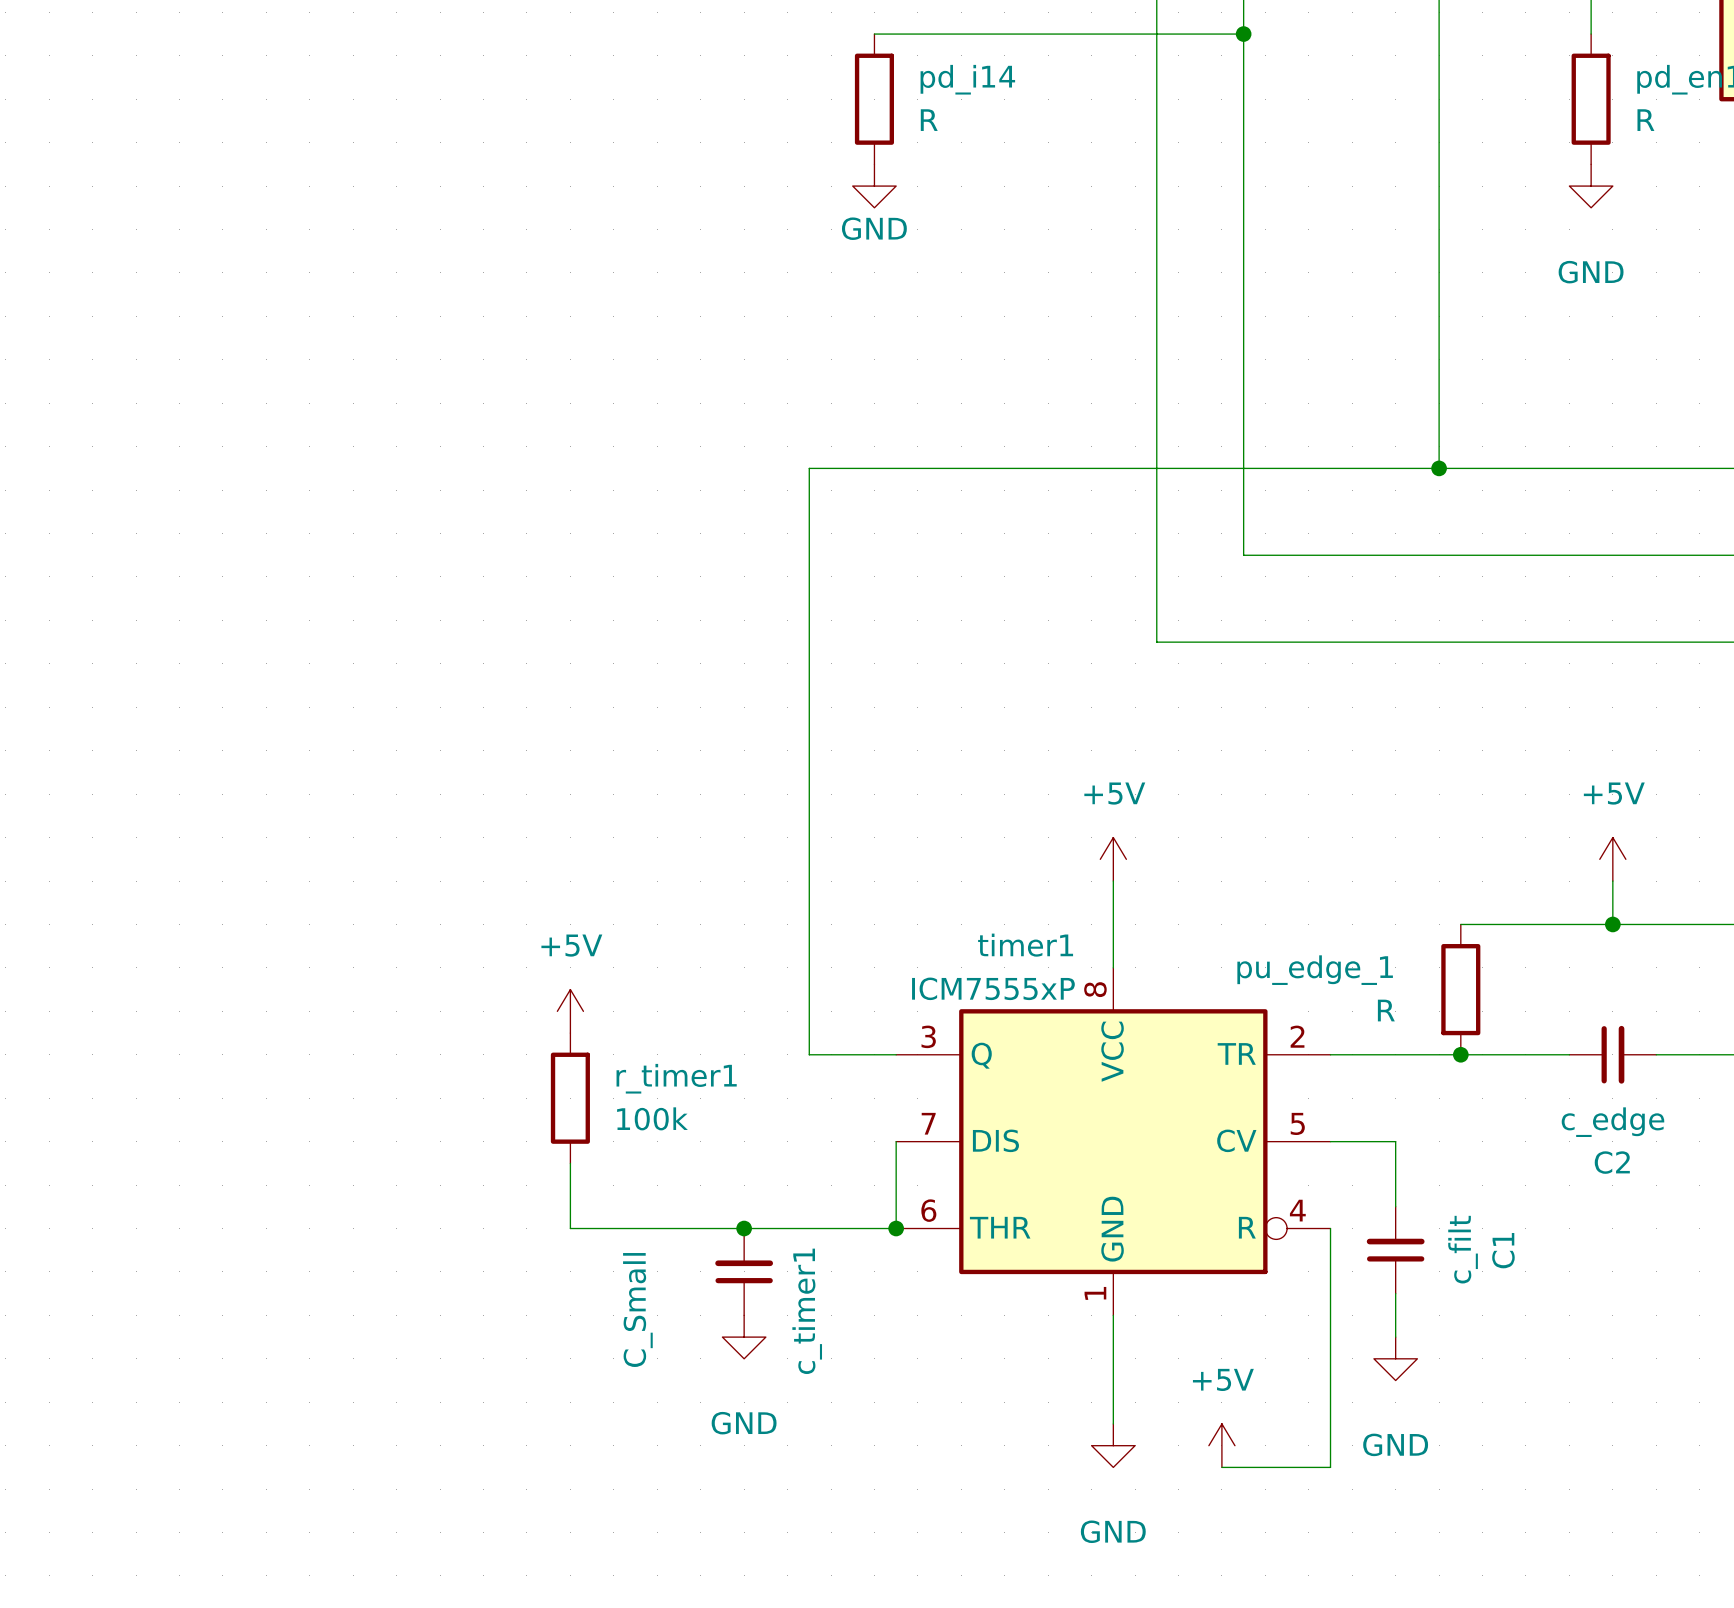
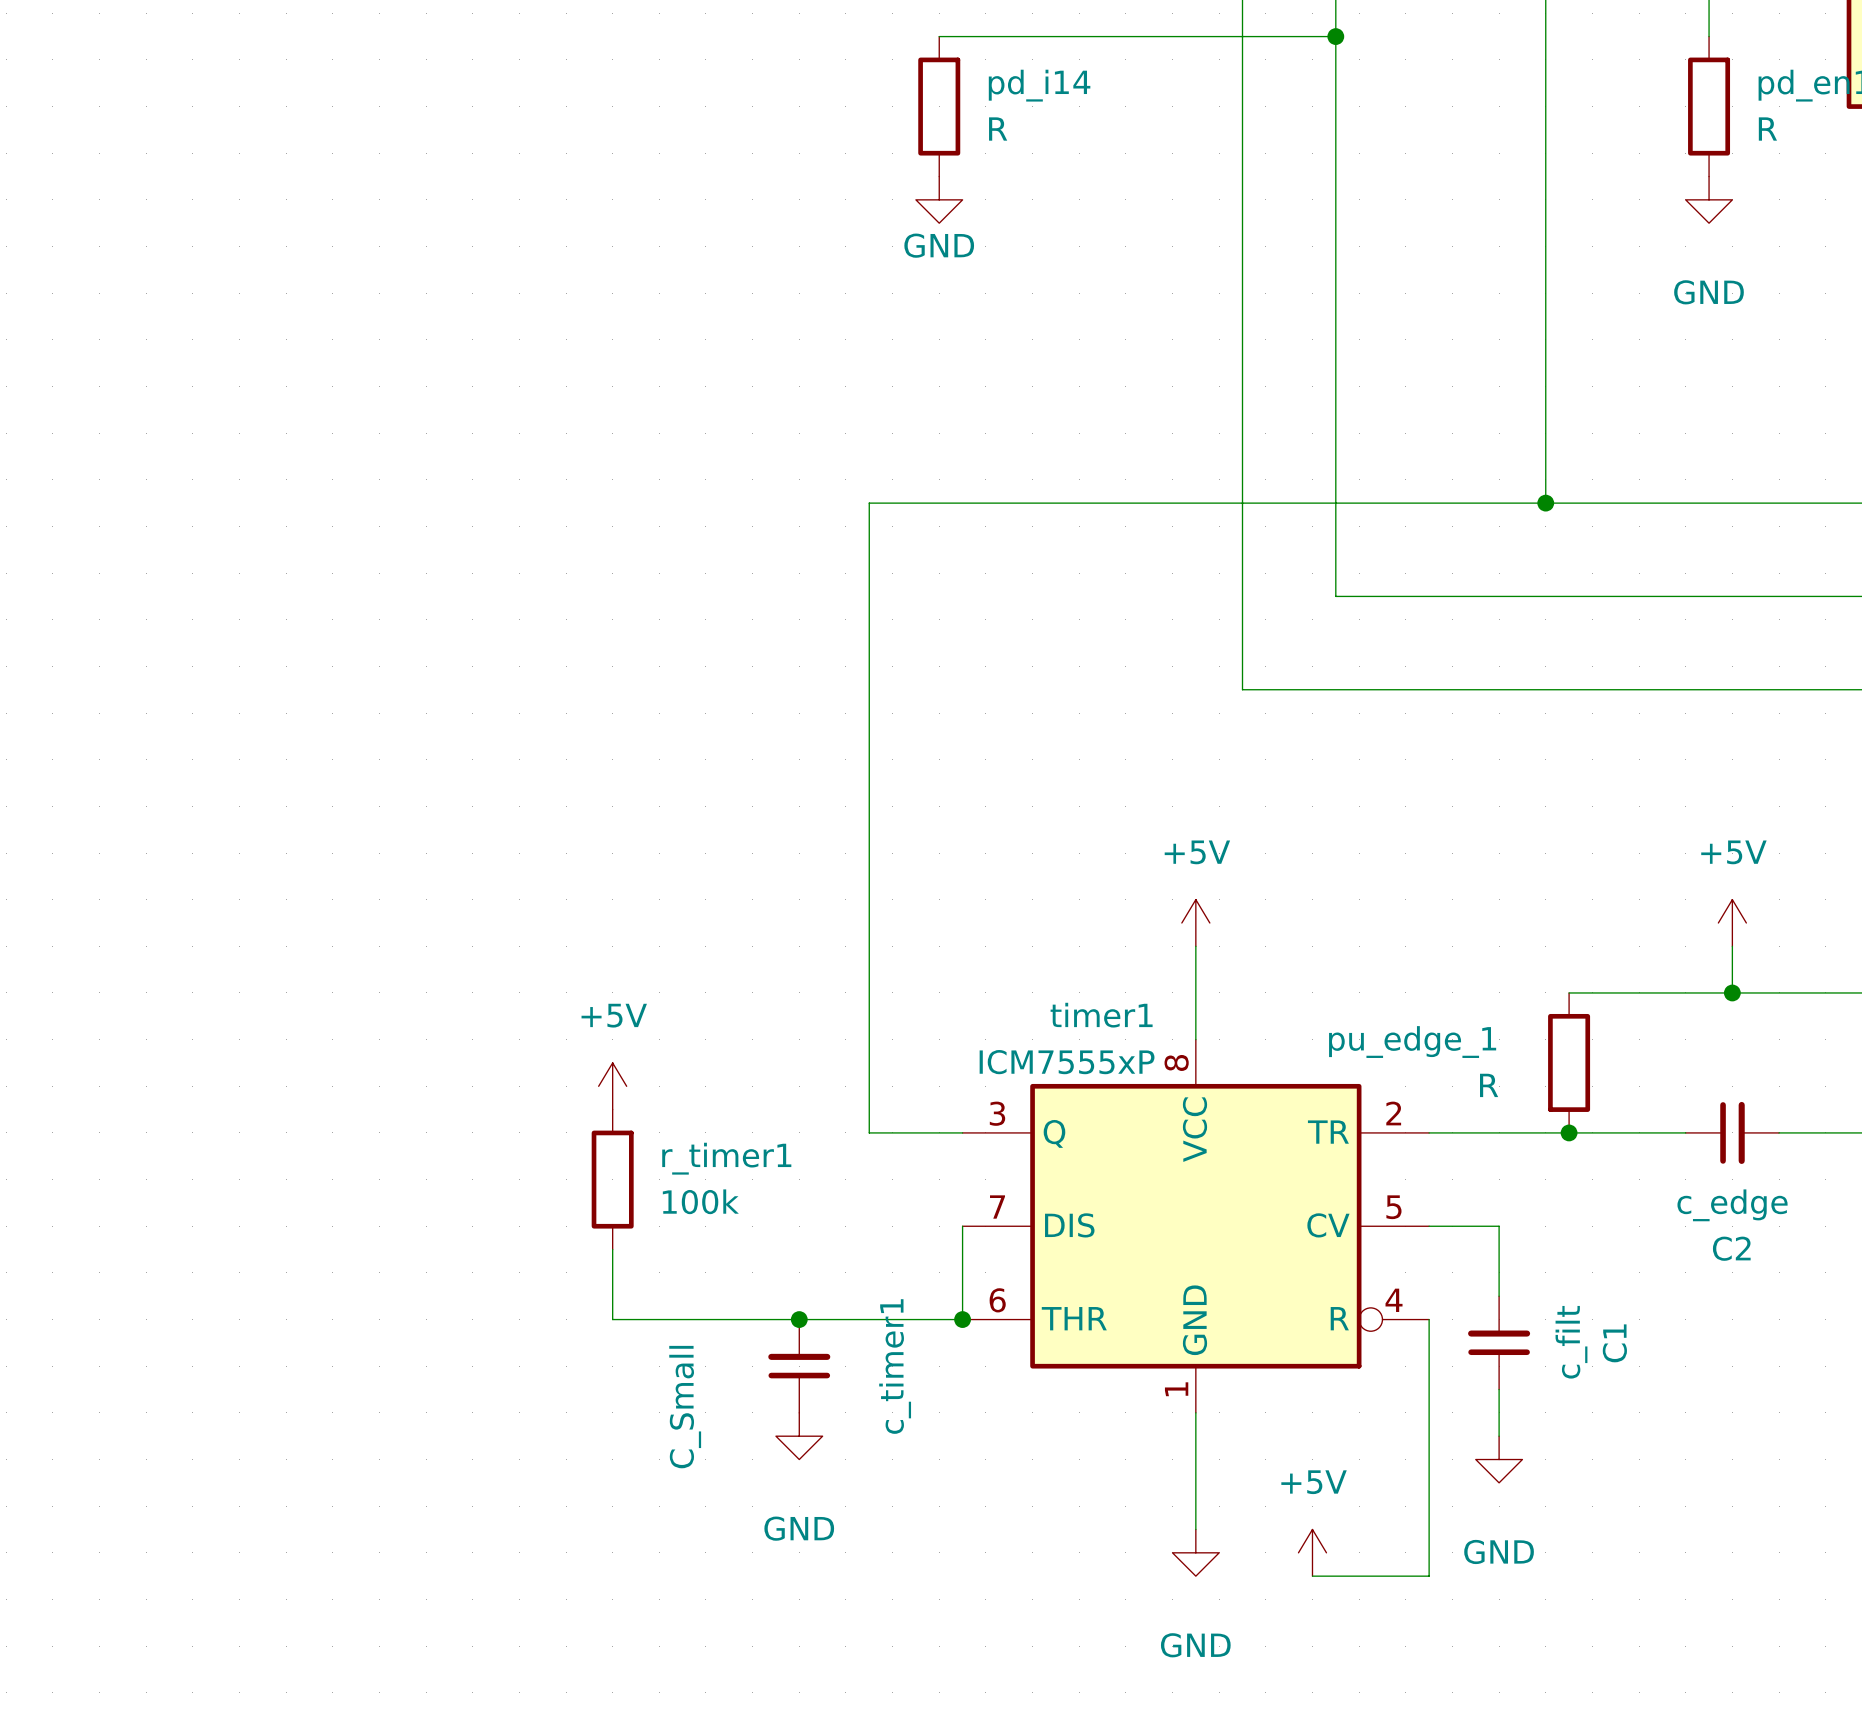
c_timer1 name position: c_timer1 (807, 1311) -> c_timer1 (895, 1366)

